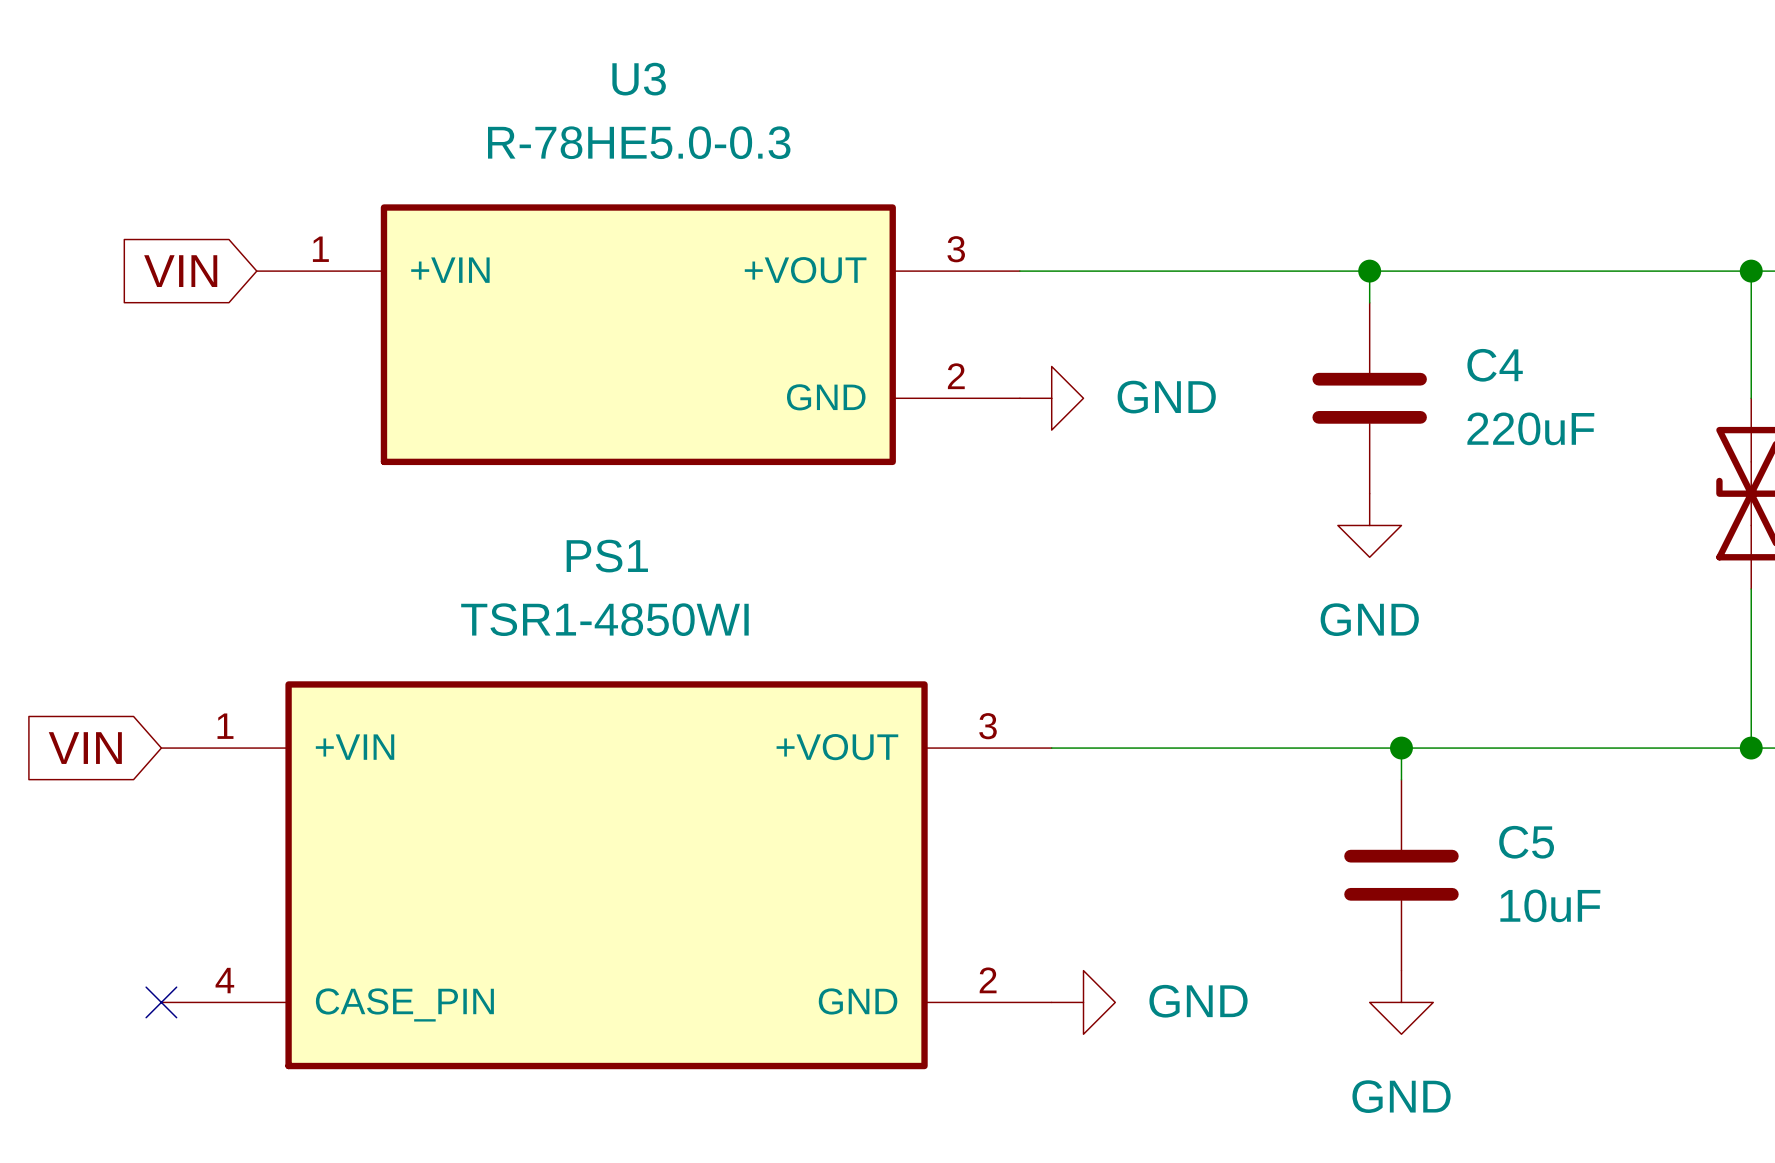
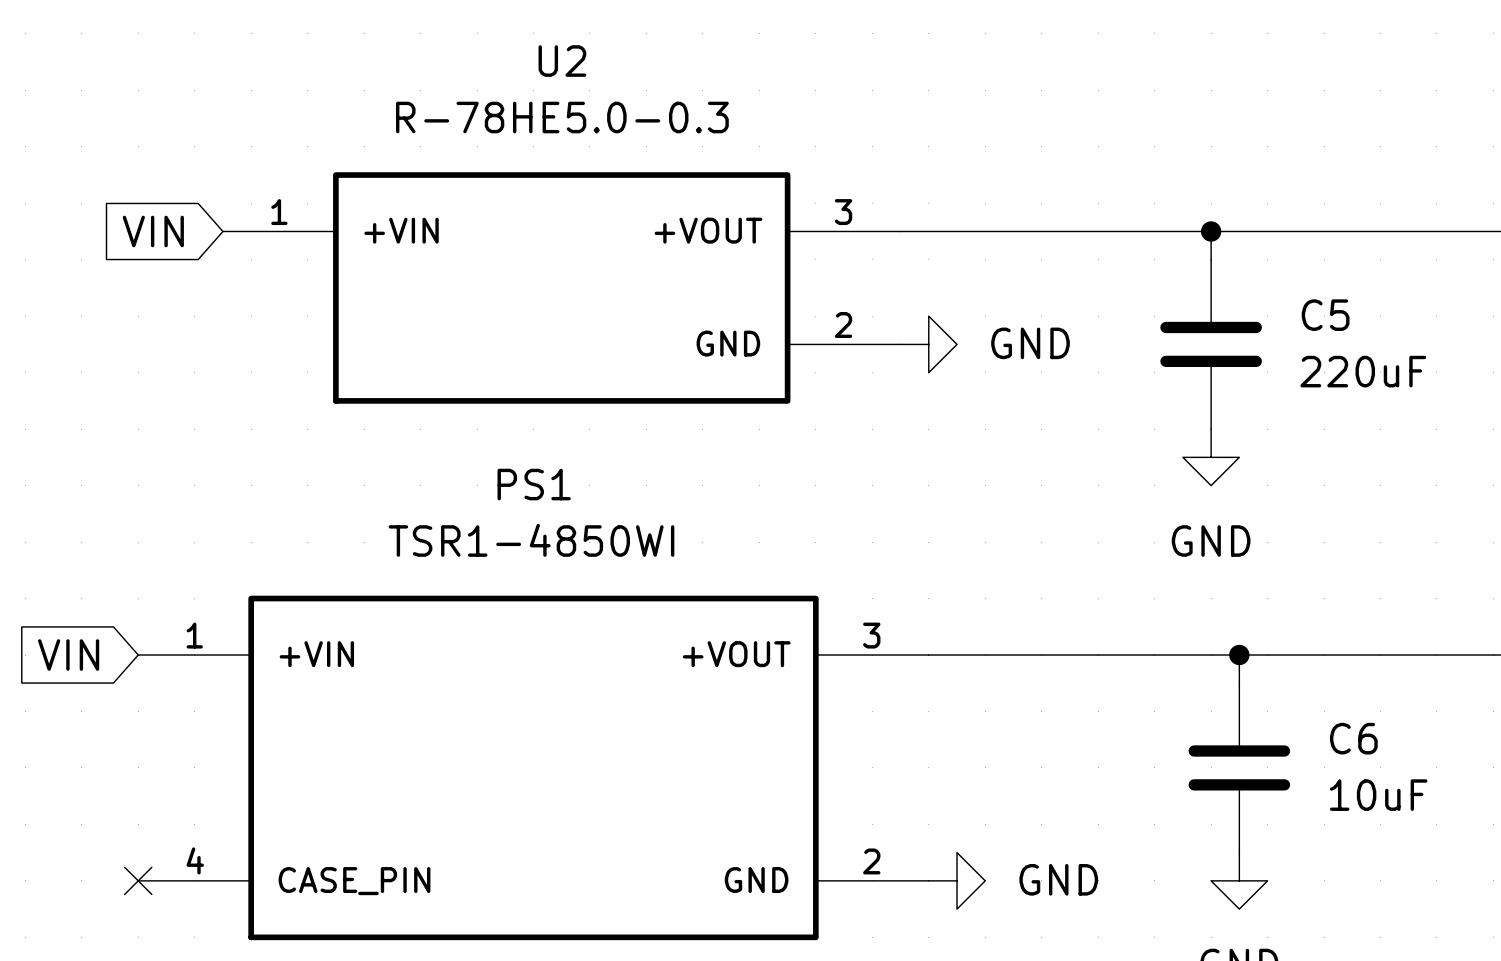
U3 name: U3 (639, 79) -> U2 (562, 61)
C4 name: C4 (1495, 365) -> C5 (1325, 315)
C5 name: C5 (1526, 842) -> C6 (1353, 738)

